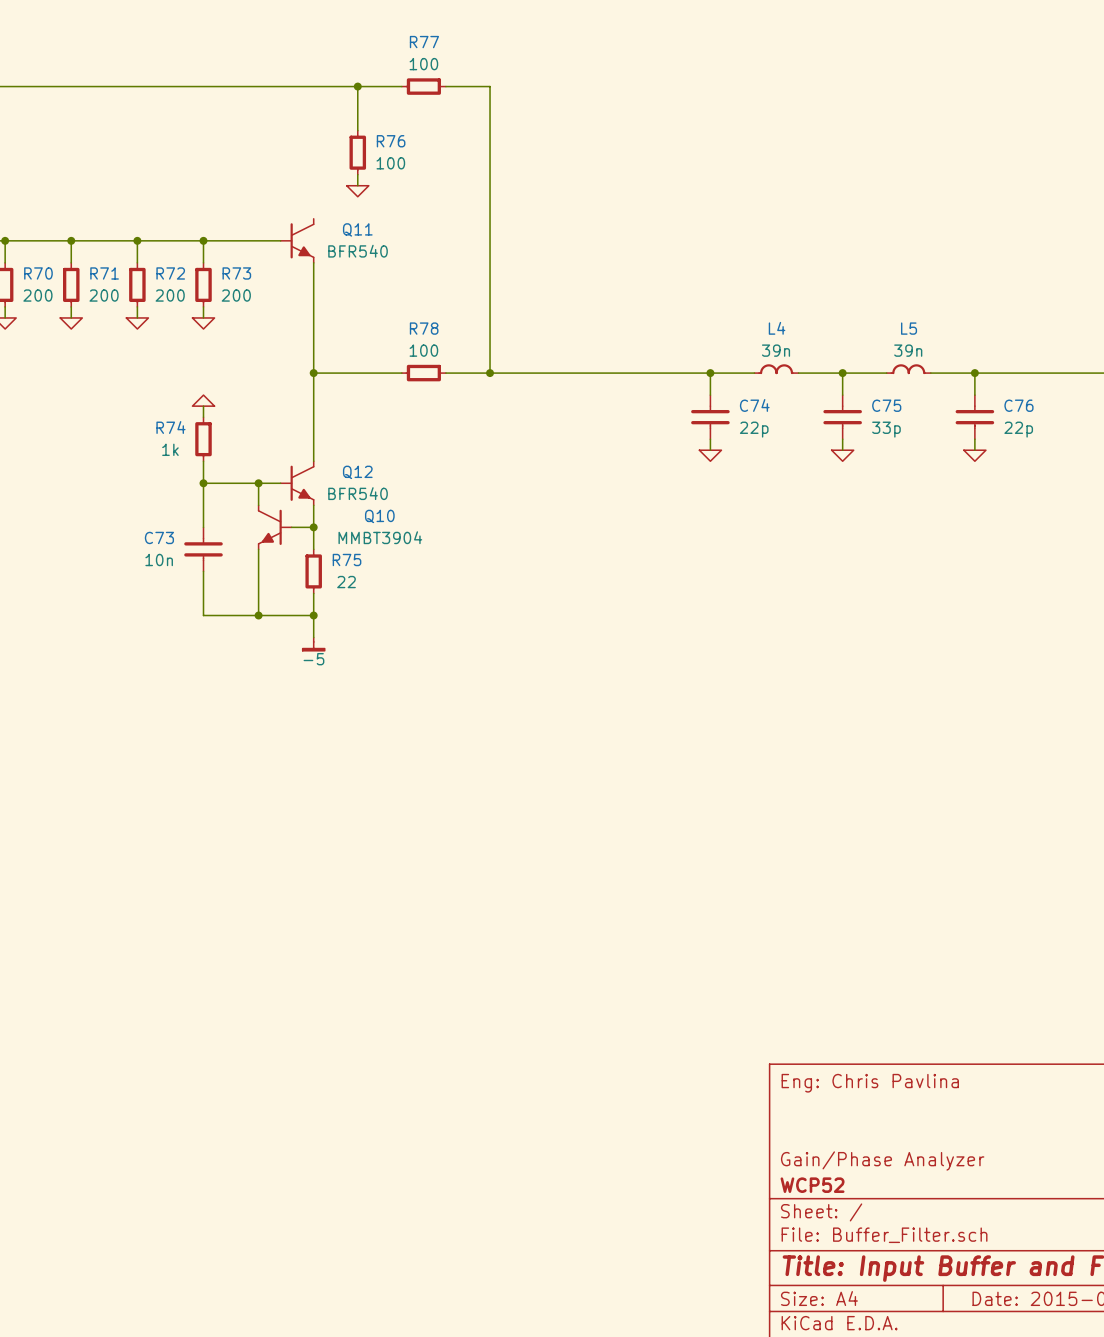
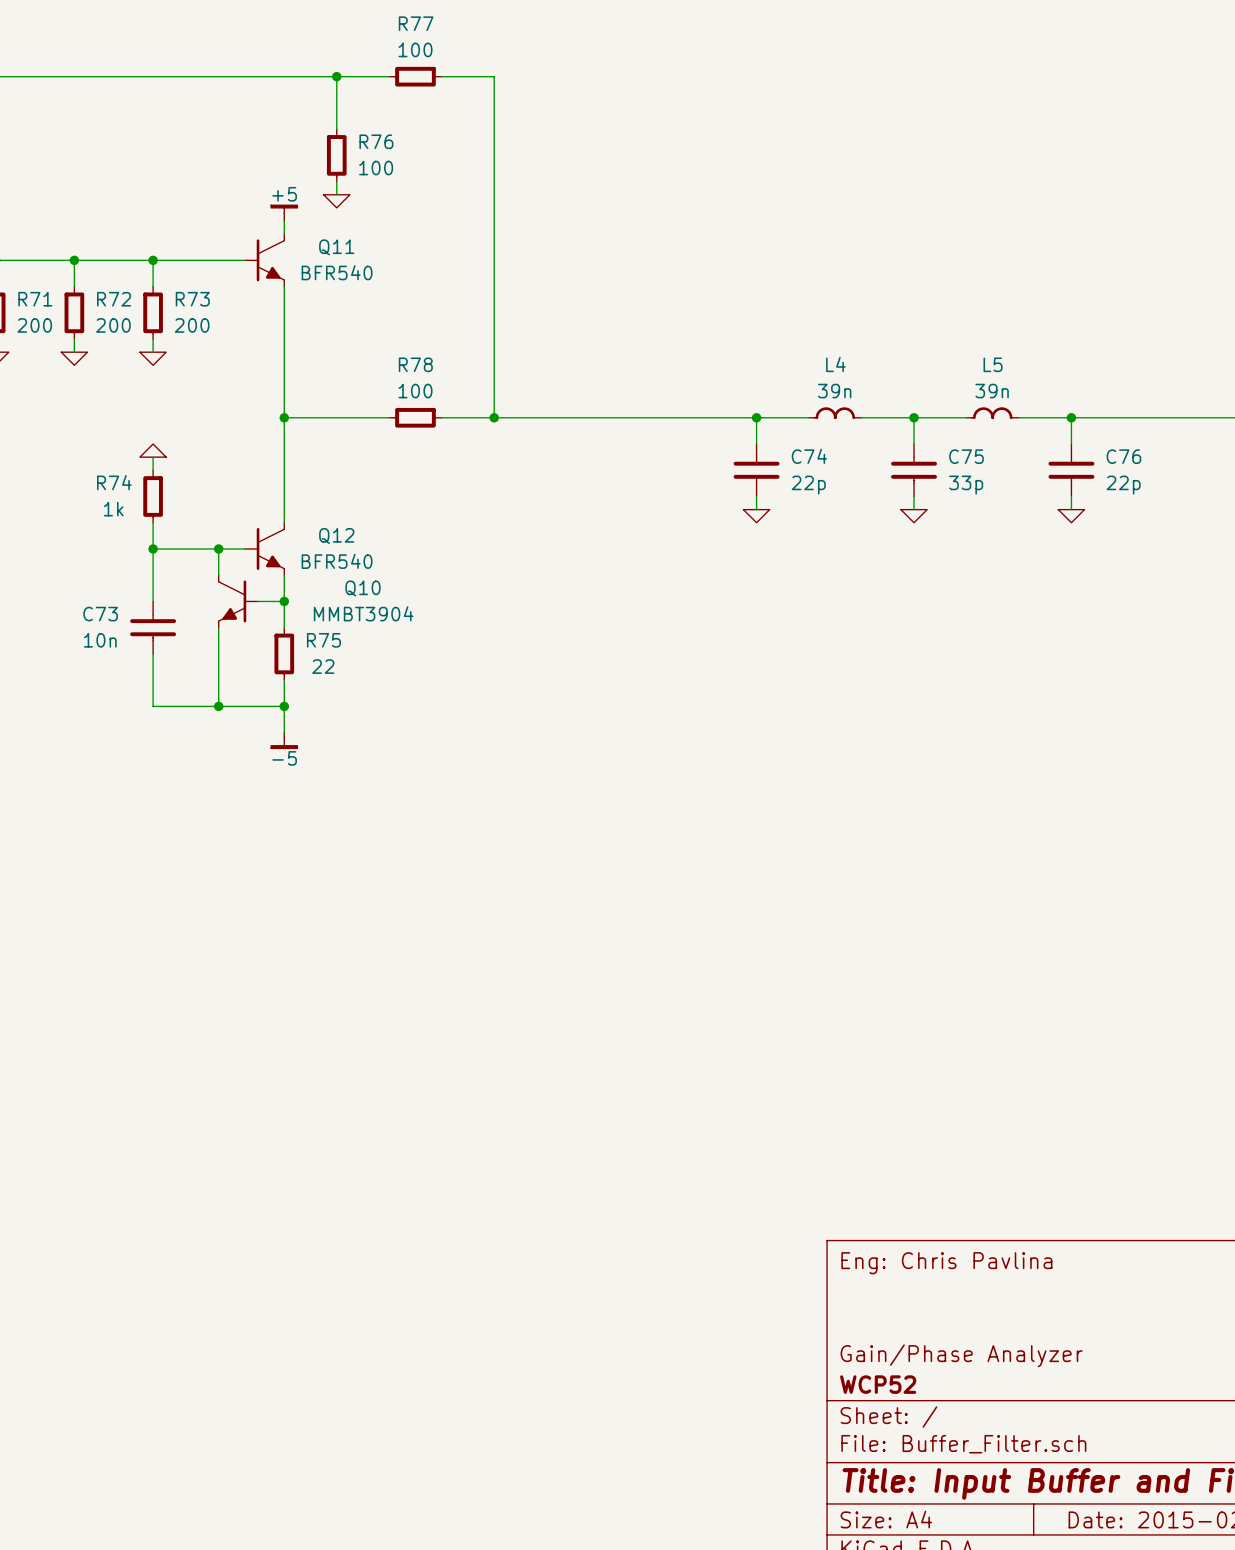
power symbol: none -> +5 (284, 213)
wire: none -> (284, 221) (284, 234)

